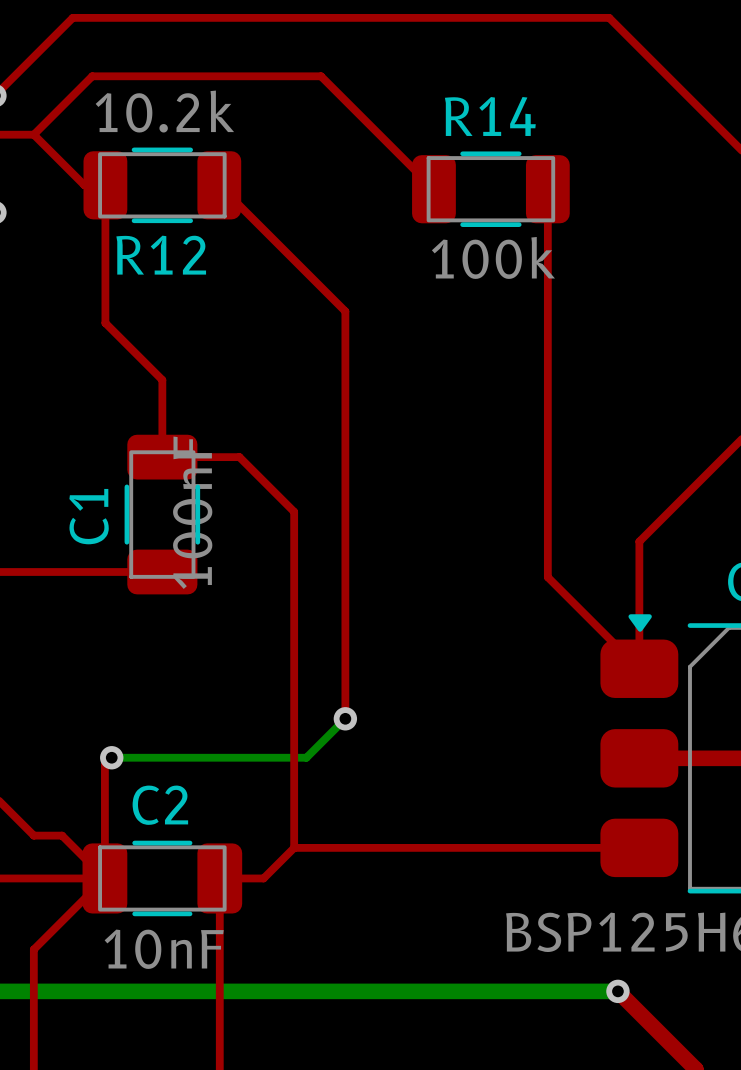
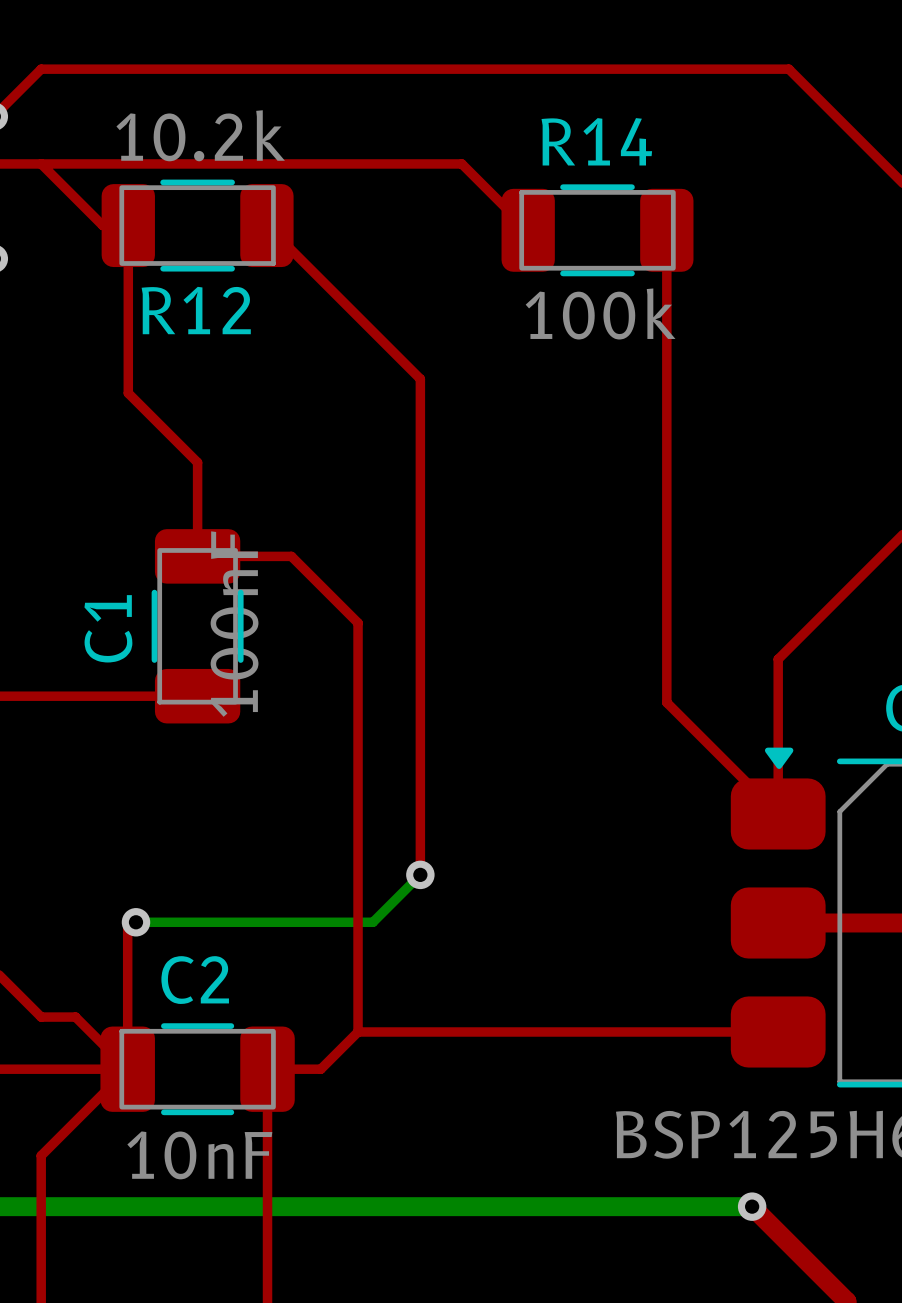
top track: (33, 56) (72, 17) (609, 17) (648, 56) -> (41, 69) (788, 69)
top track: (33, 134) (92, 76) (321, 76) (379, 134) -> (41, 163) (461, 163)

